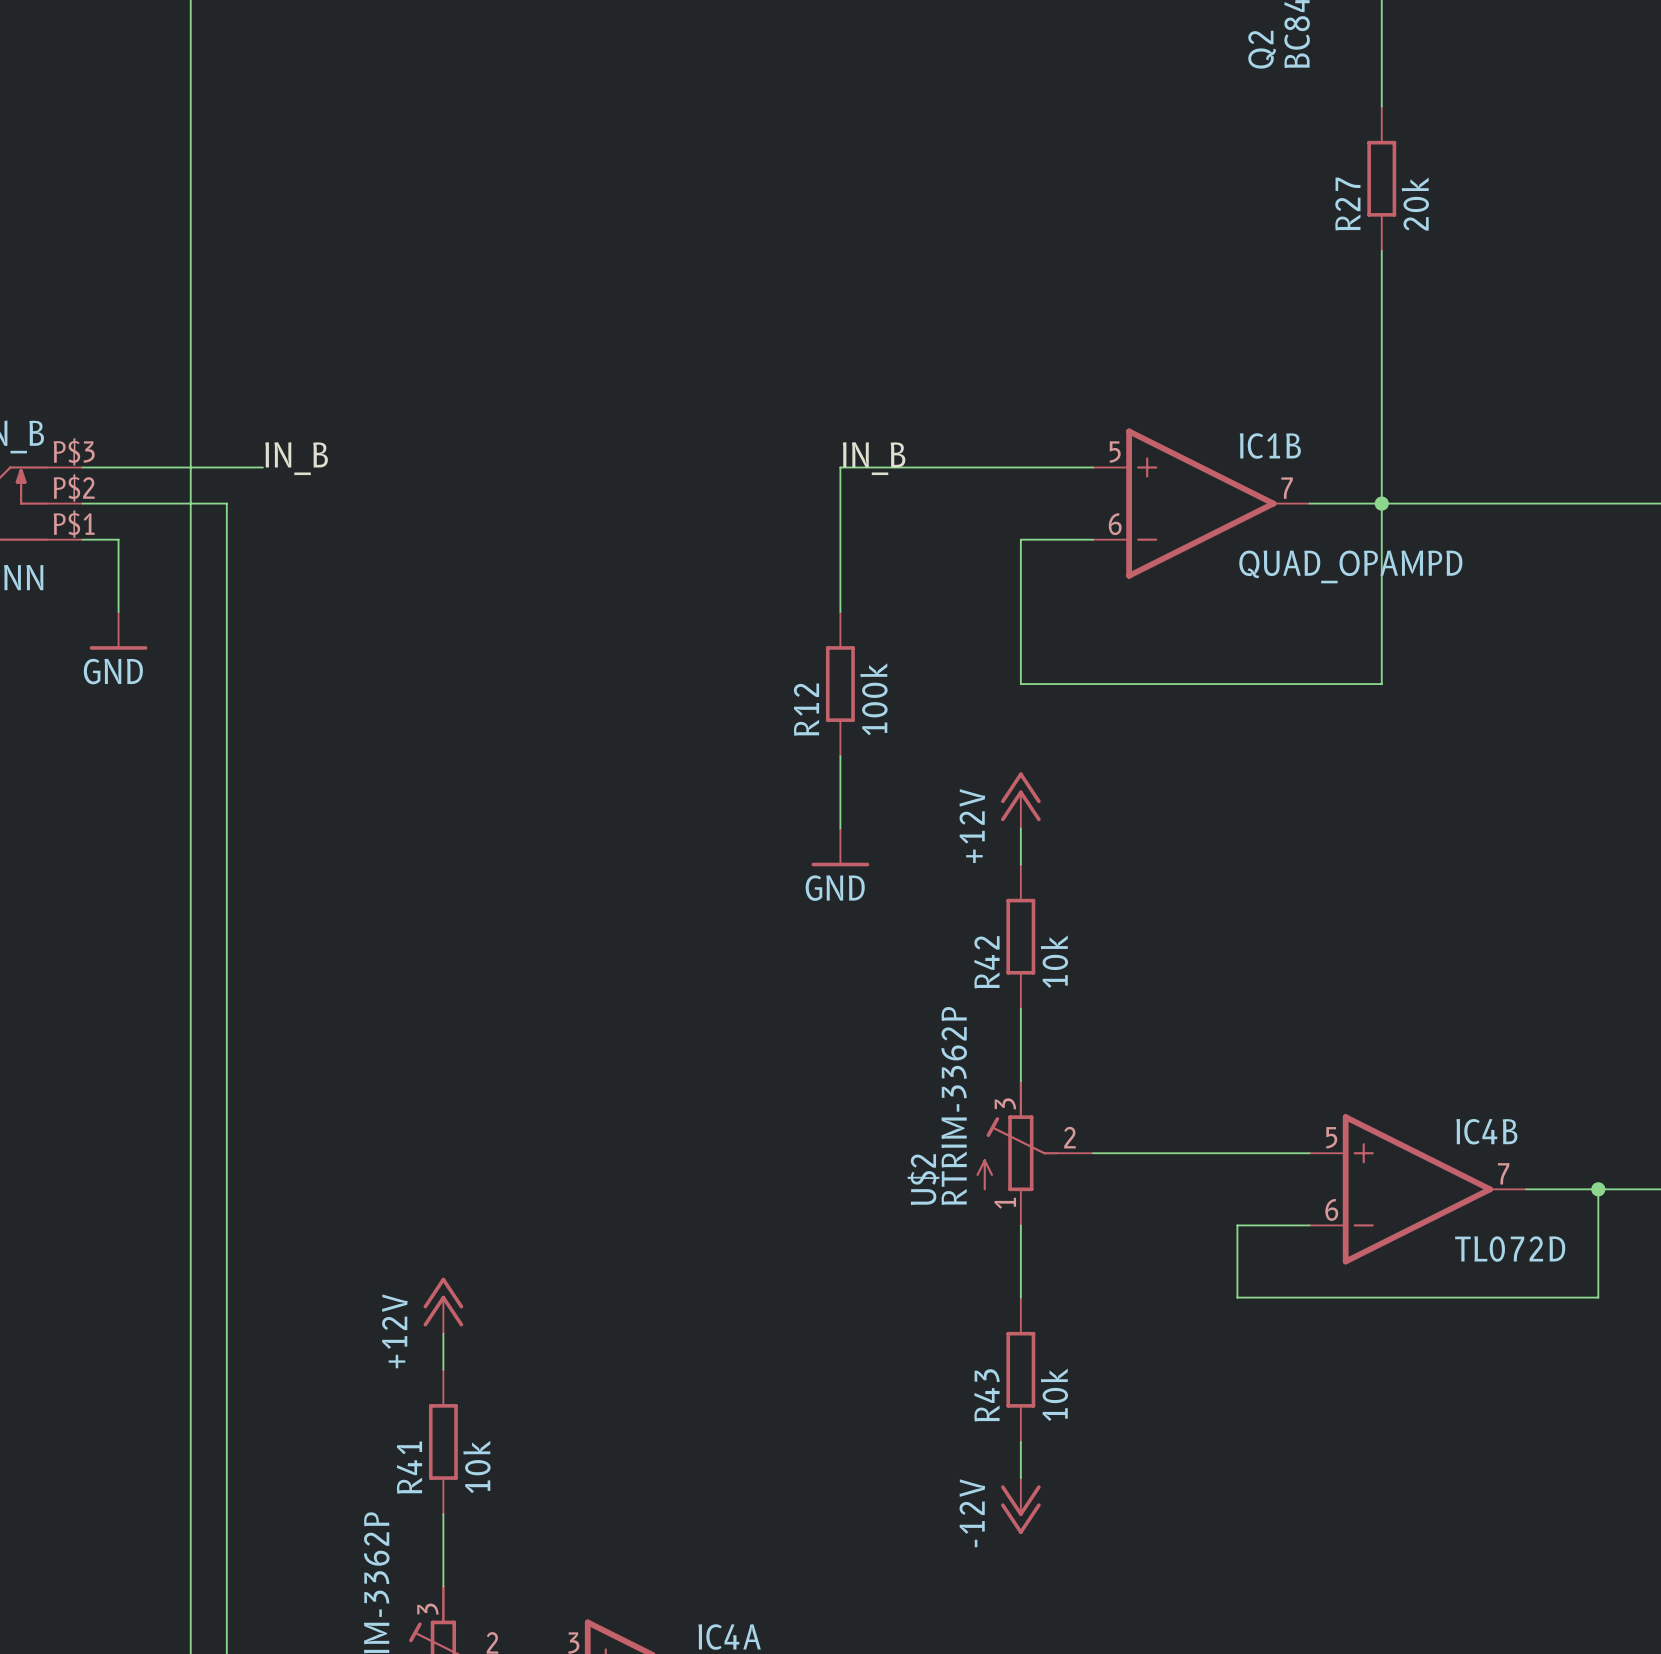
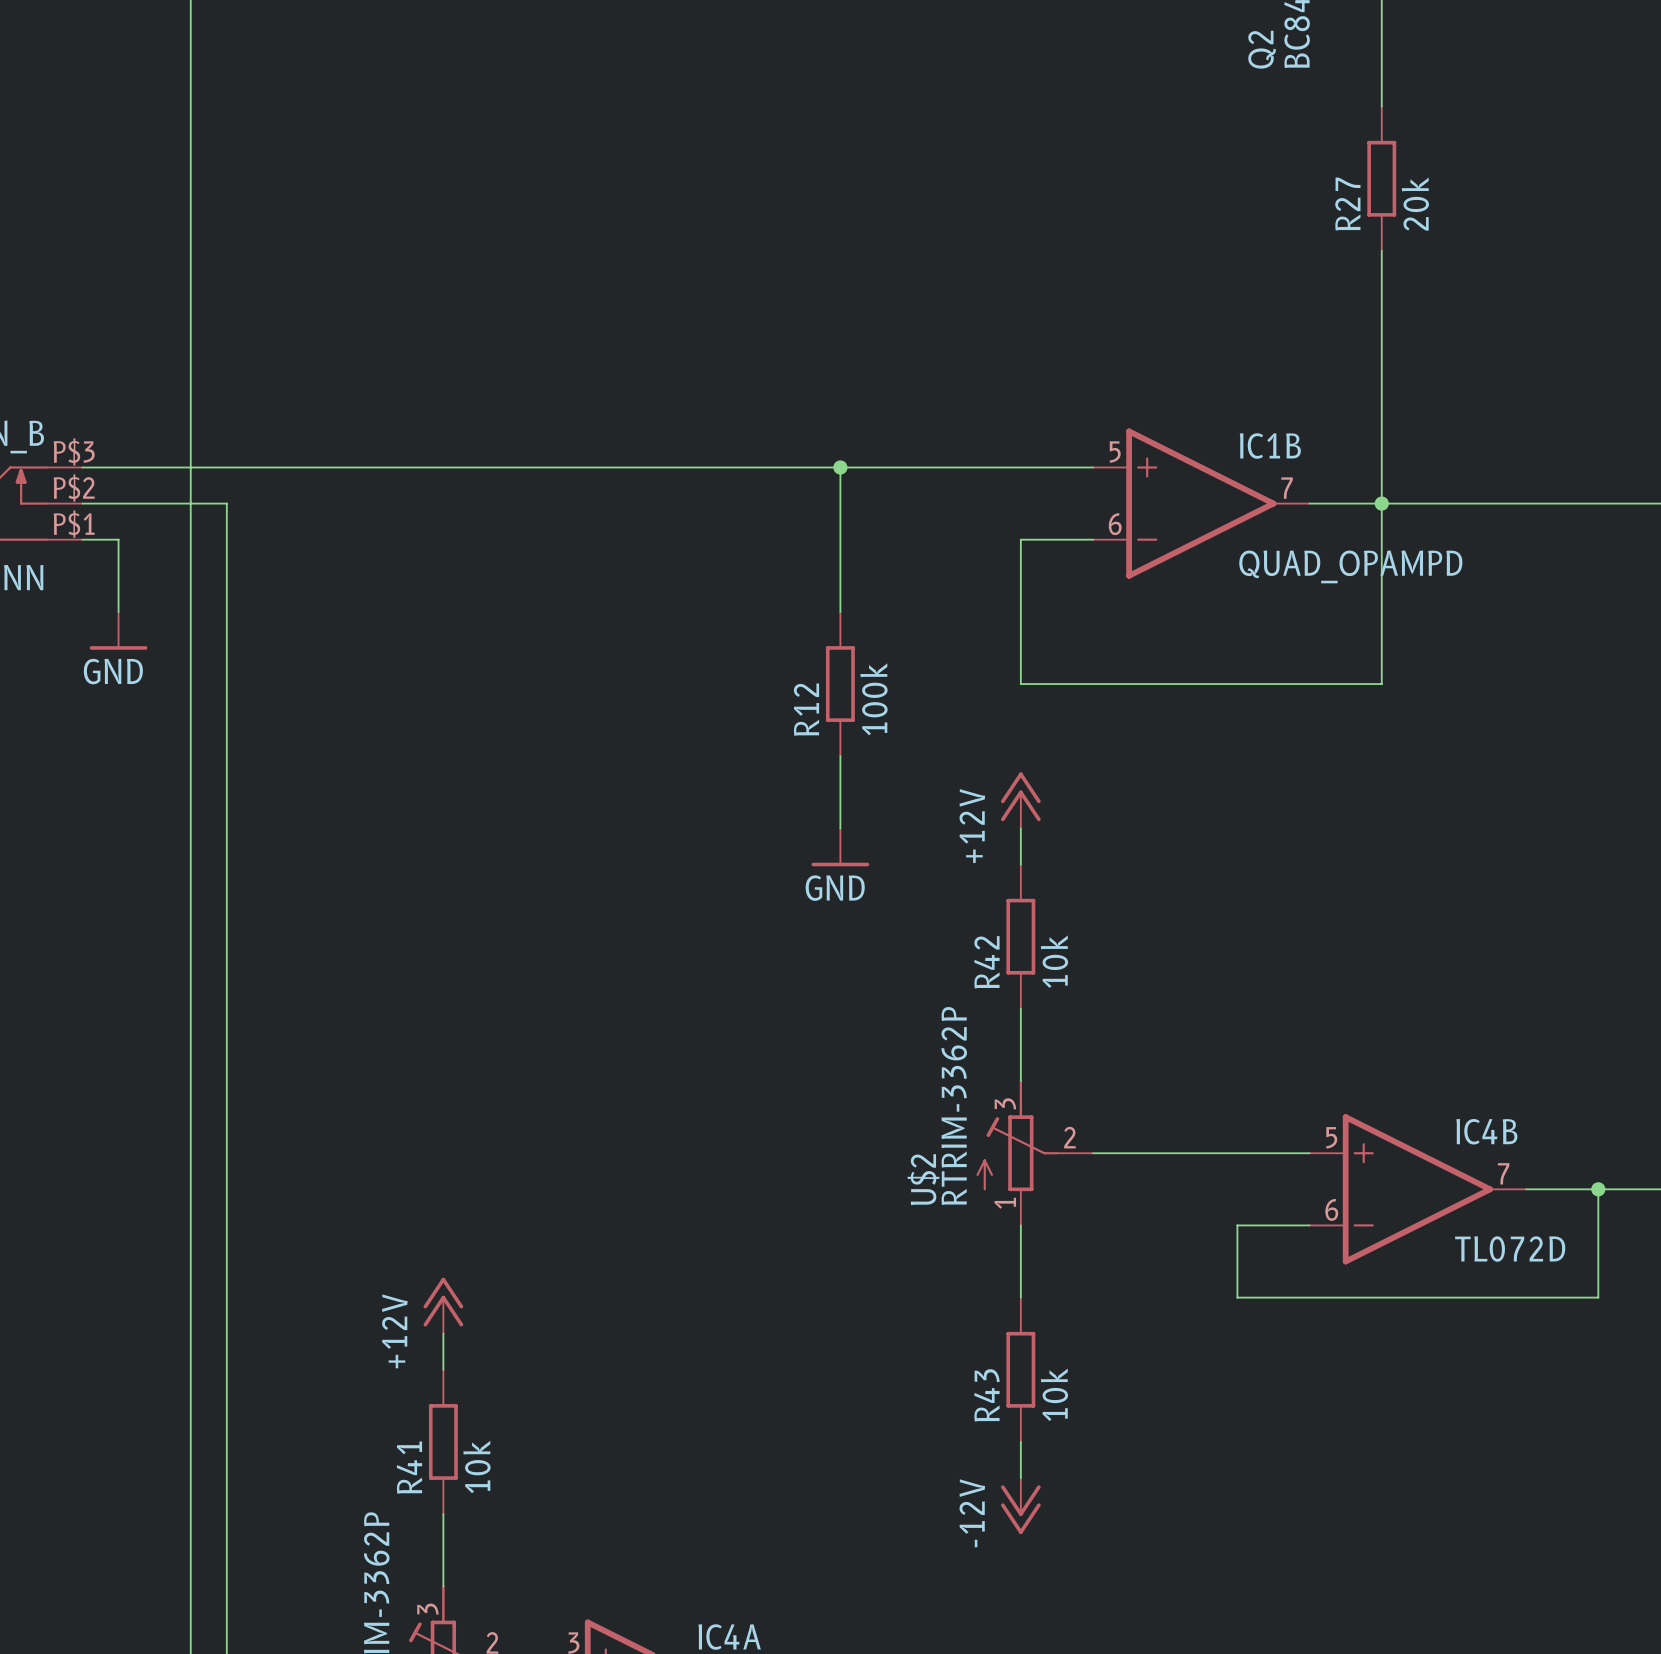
label: IN_B (296, 458) -> none
label: IN_B (874, 458) -> none
wire: none -> (262, 467) (840, 467)
junction: none -> (840, 467)

